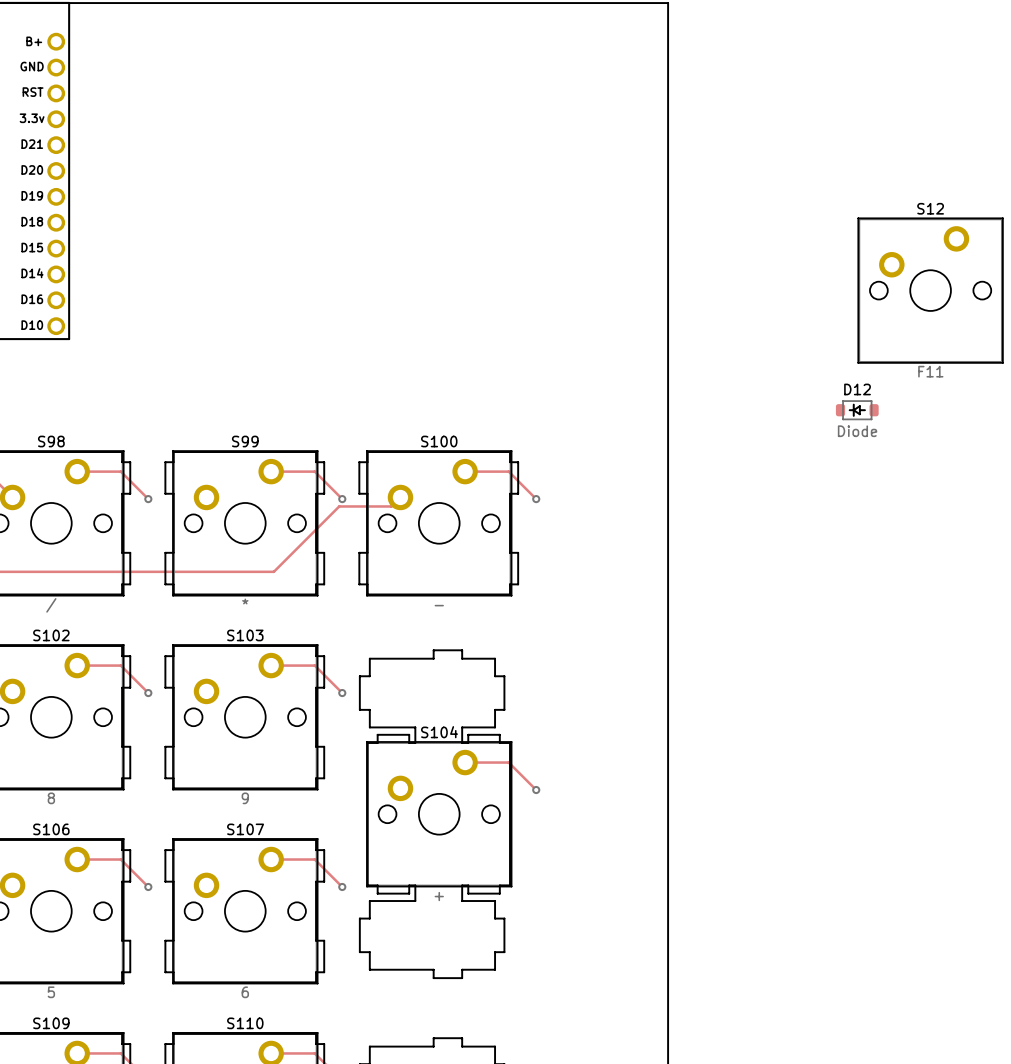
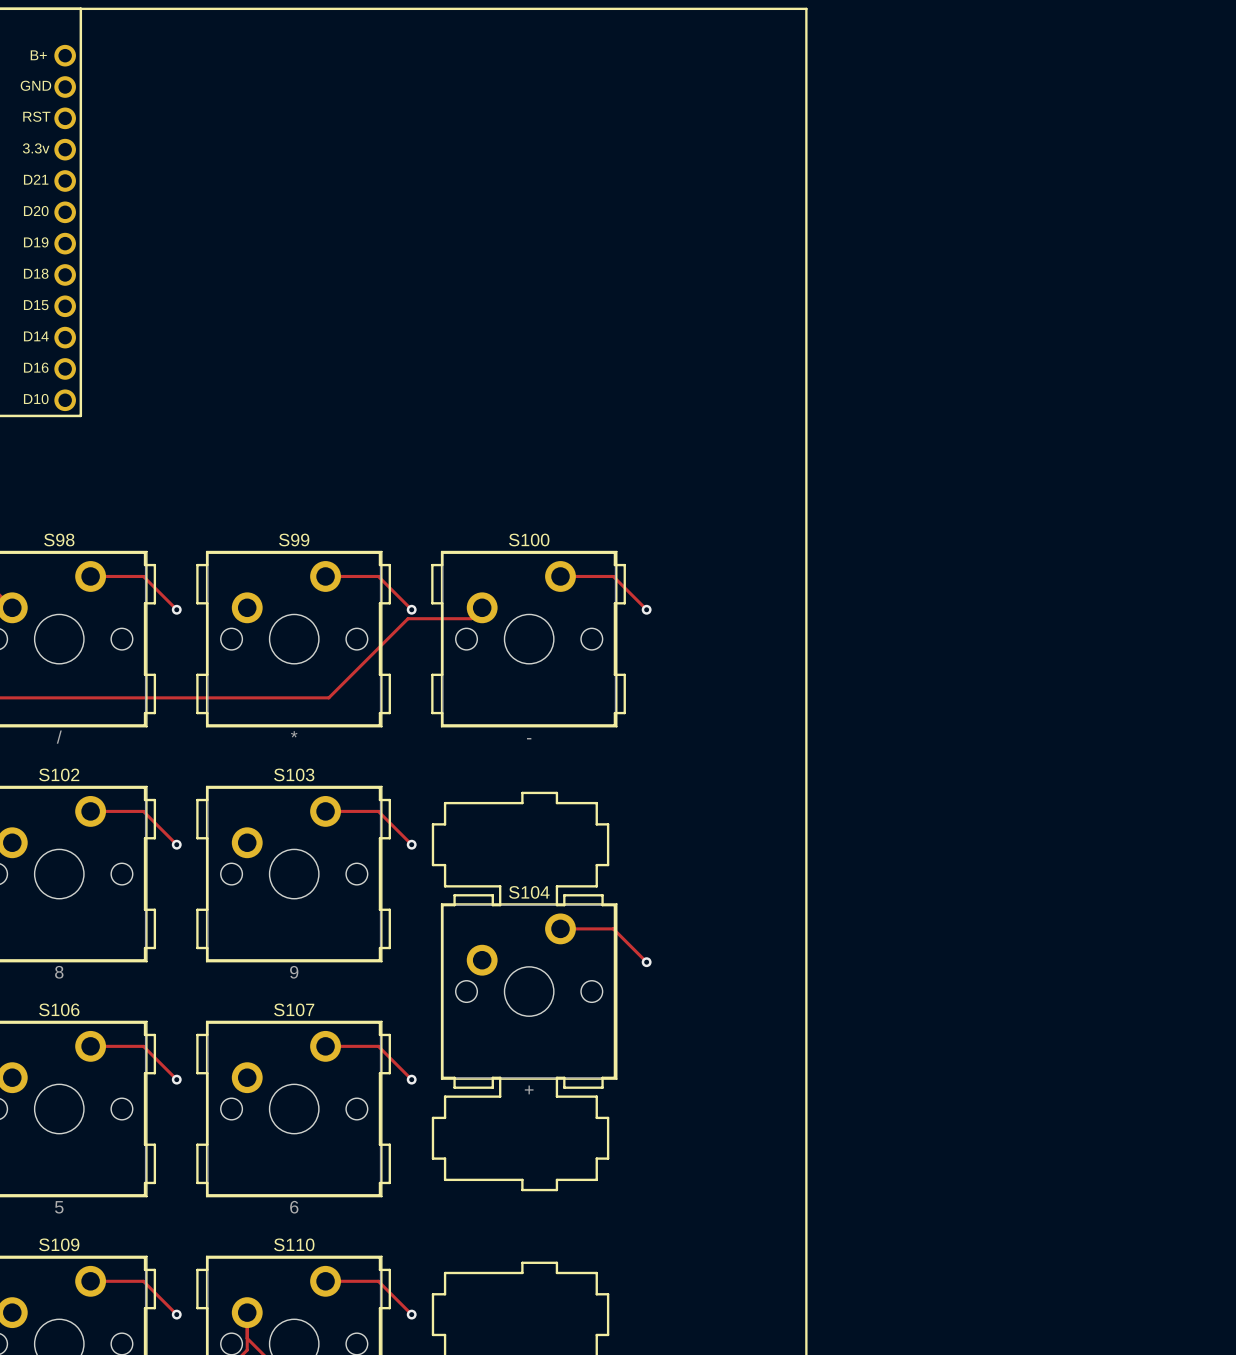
S12: F11 (930, 290) -> none
D12: Diode (857, 410) -> none

